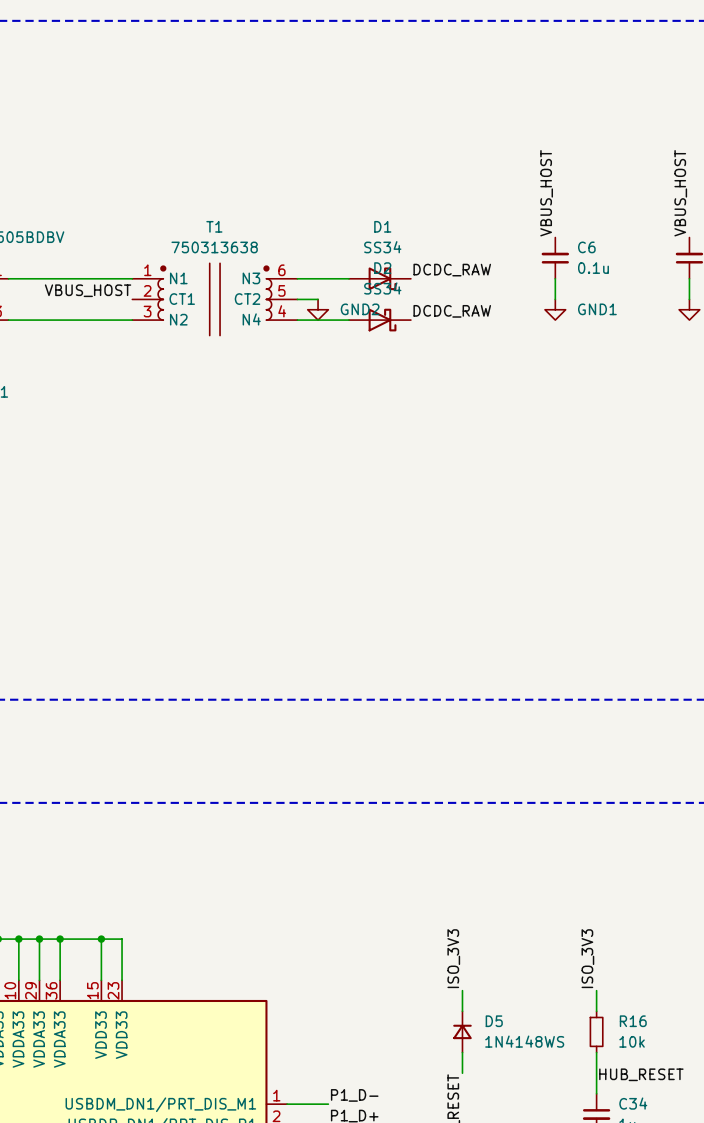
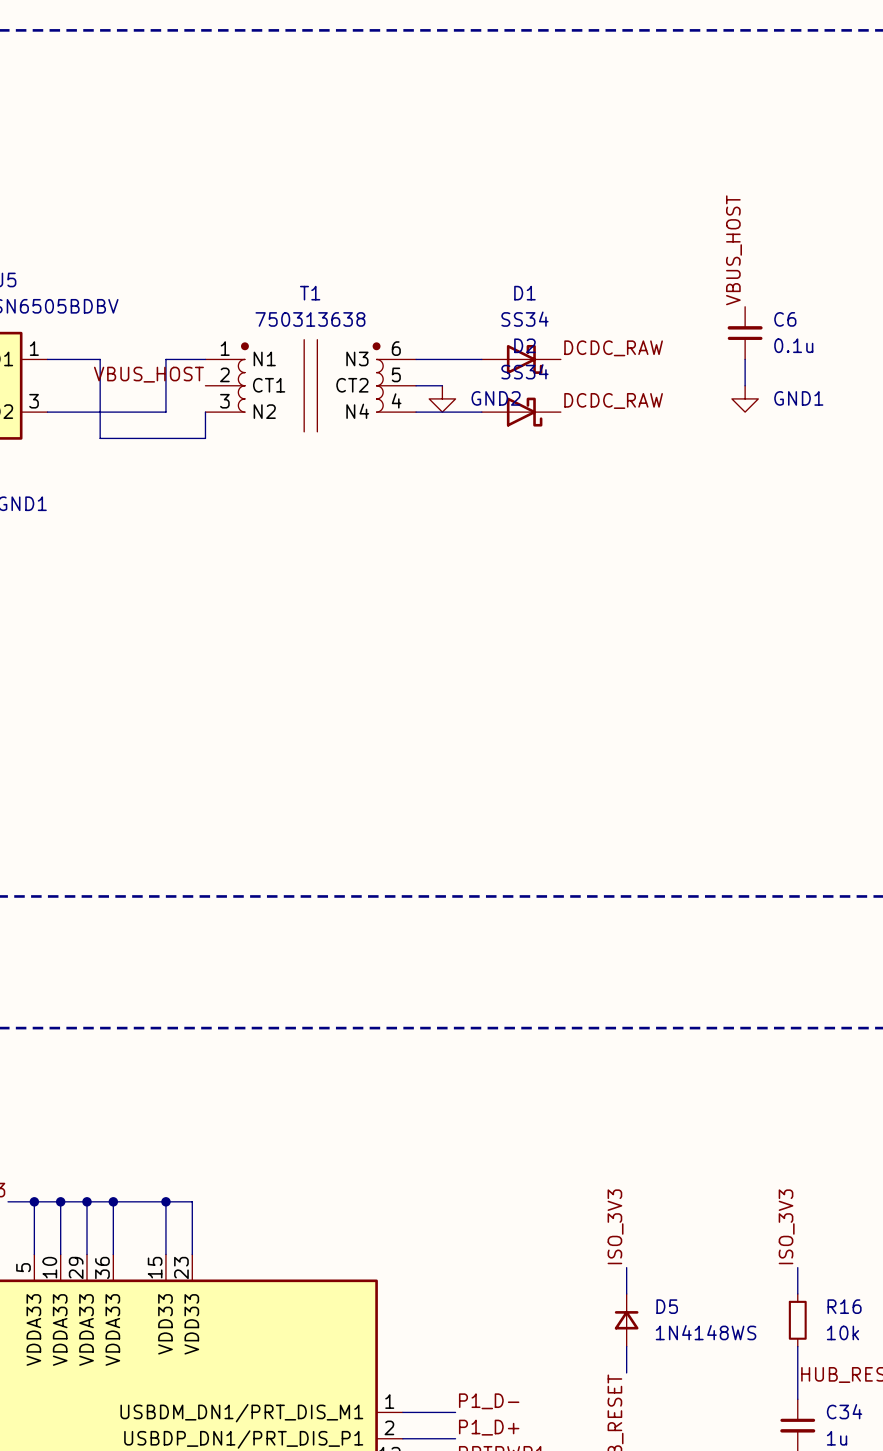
wire: (49, 278) (101, 278) -> (100, 359) (100, 438) (205, 438) (205, 412)
wire: (101, 320) (132, 320) -> (165, 412) (165, 359)

